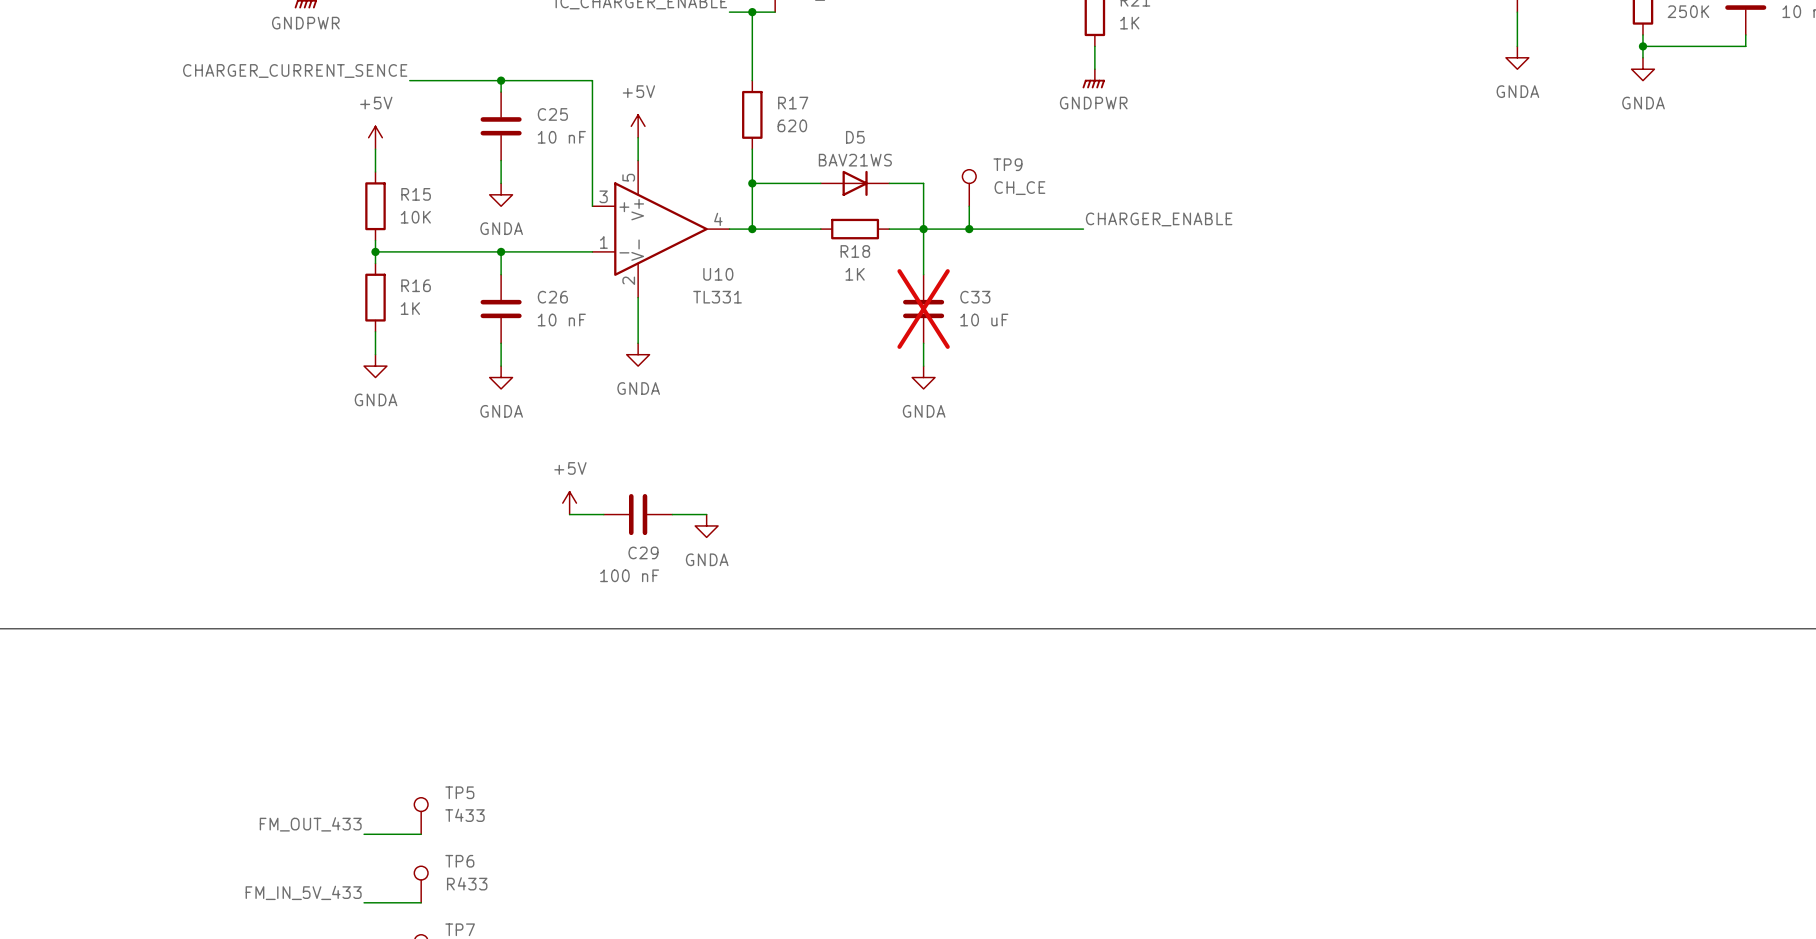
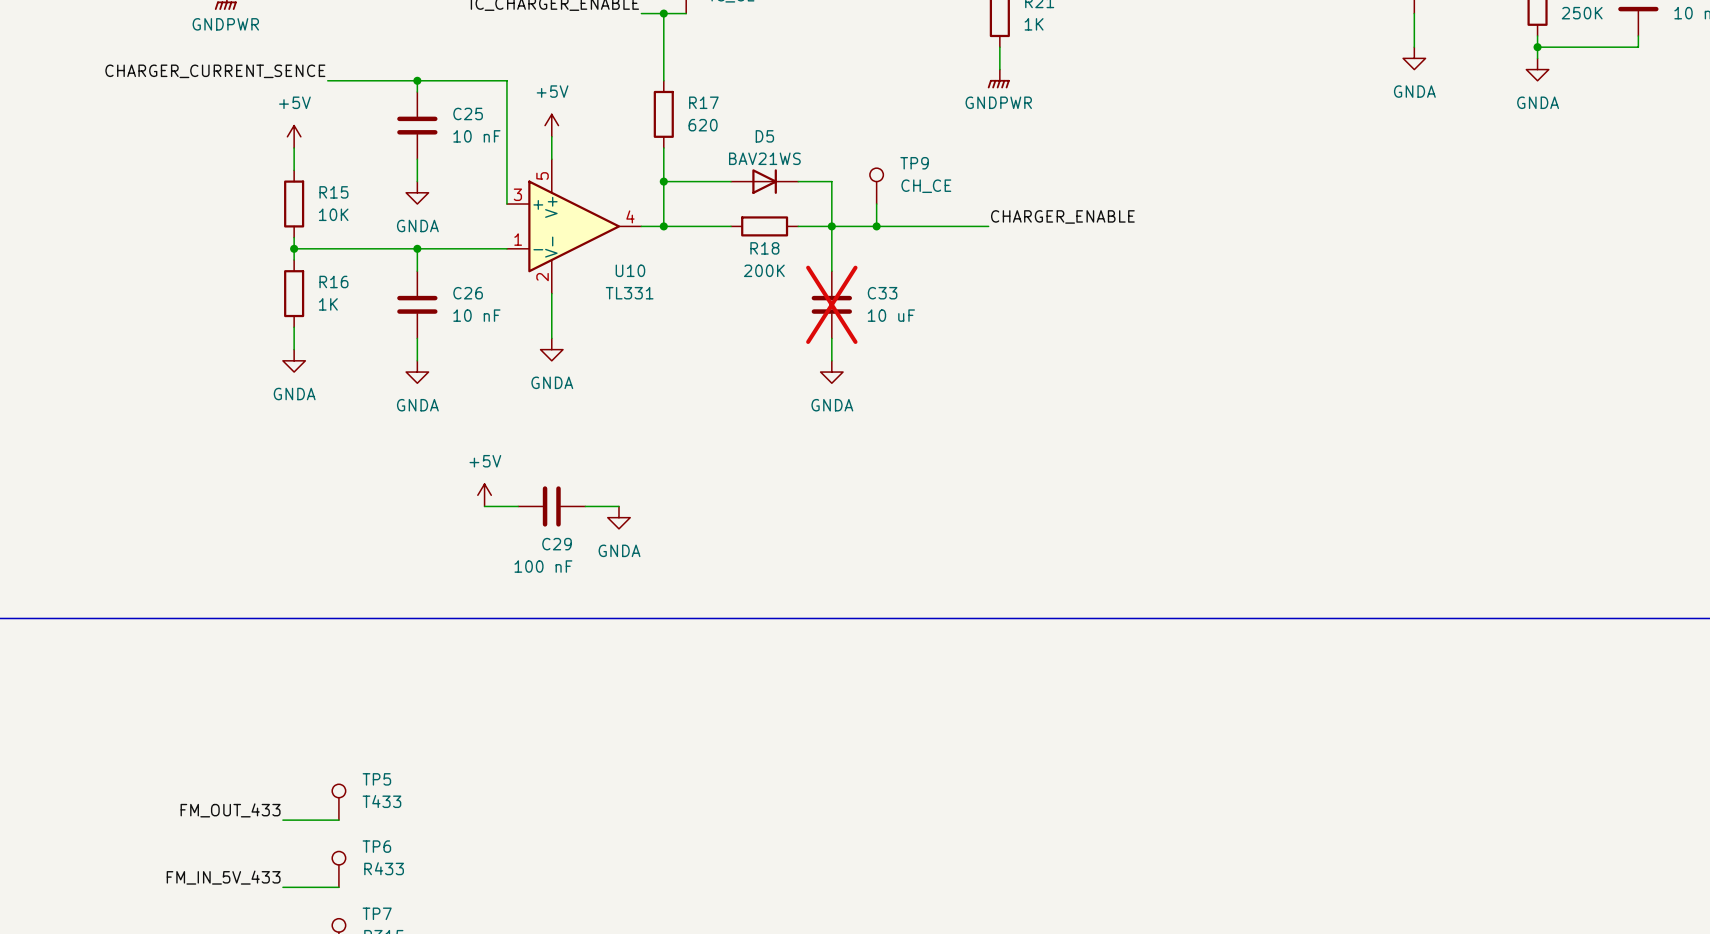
R18 value: 1K (855, 274) -> 200K (764, 270)

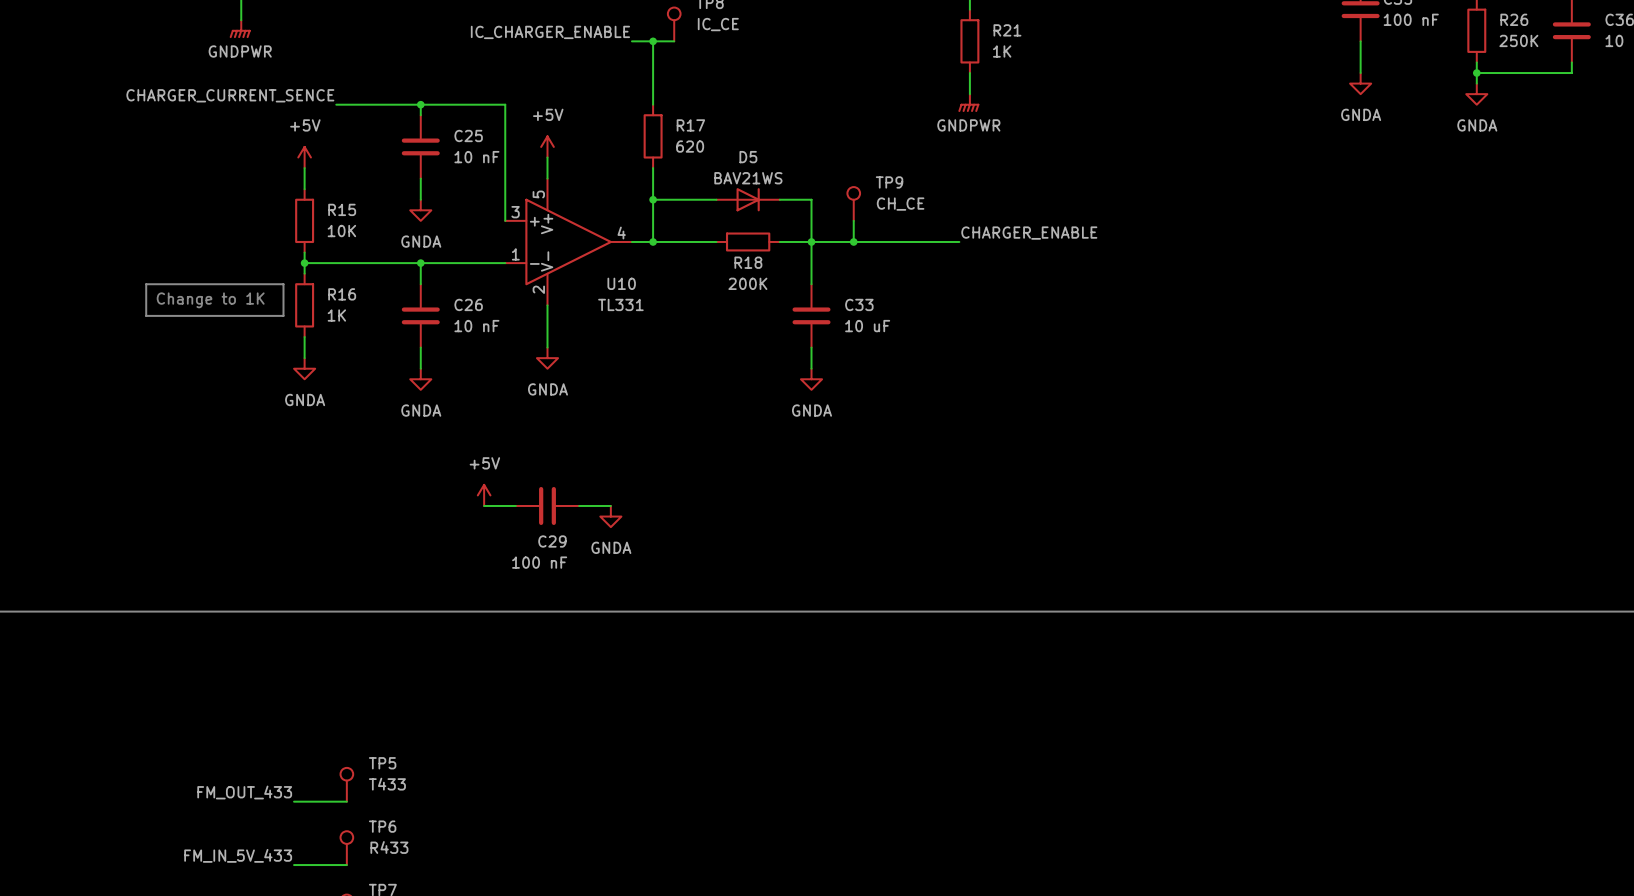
line: none -> (146, 284) (283, 284) (283, 315) (146, 315) (146, 284)
text: none -> Change to 1K (210, 300)
C33 do-not-place cross: (831, 304) -> none

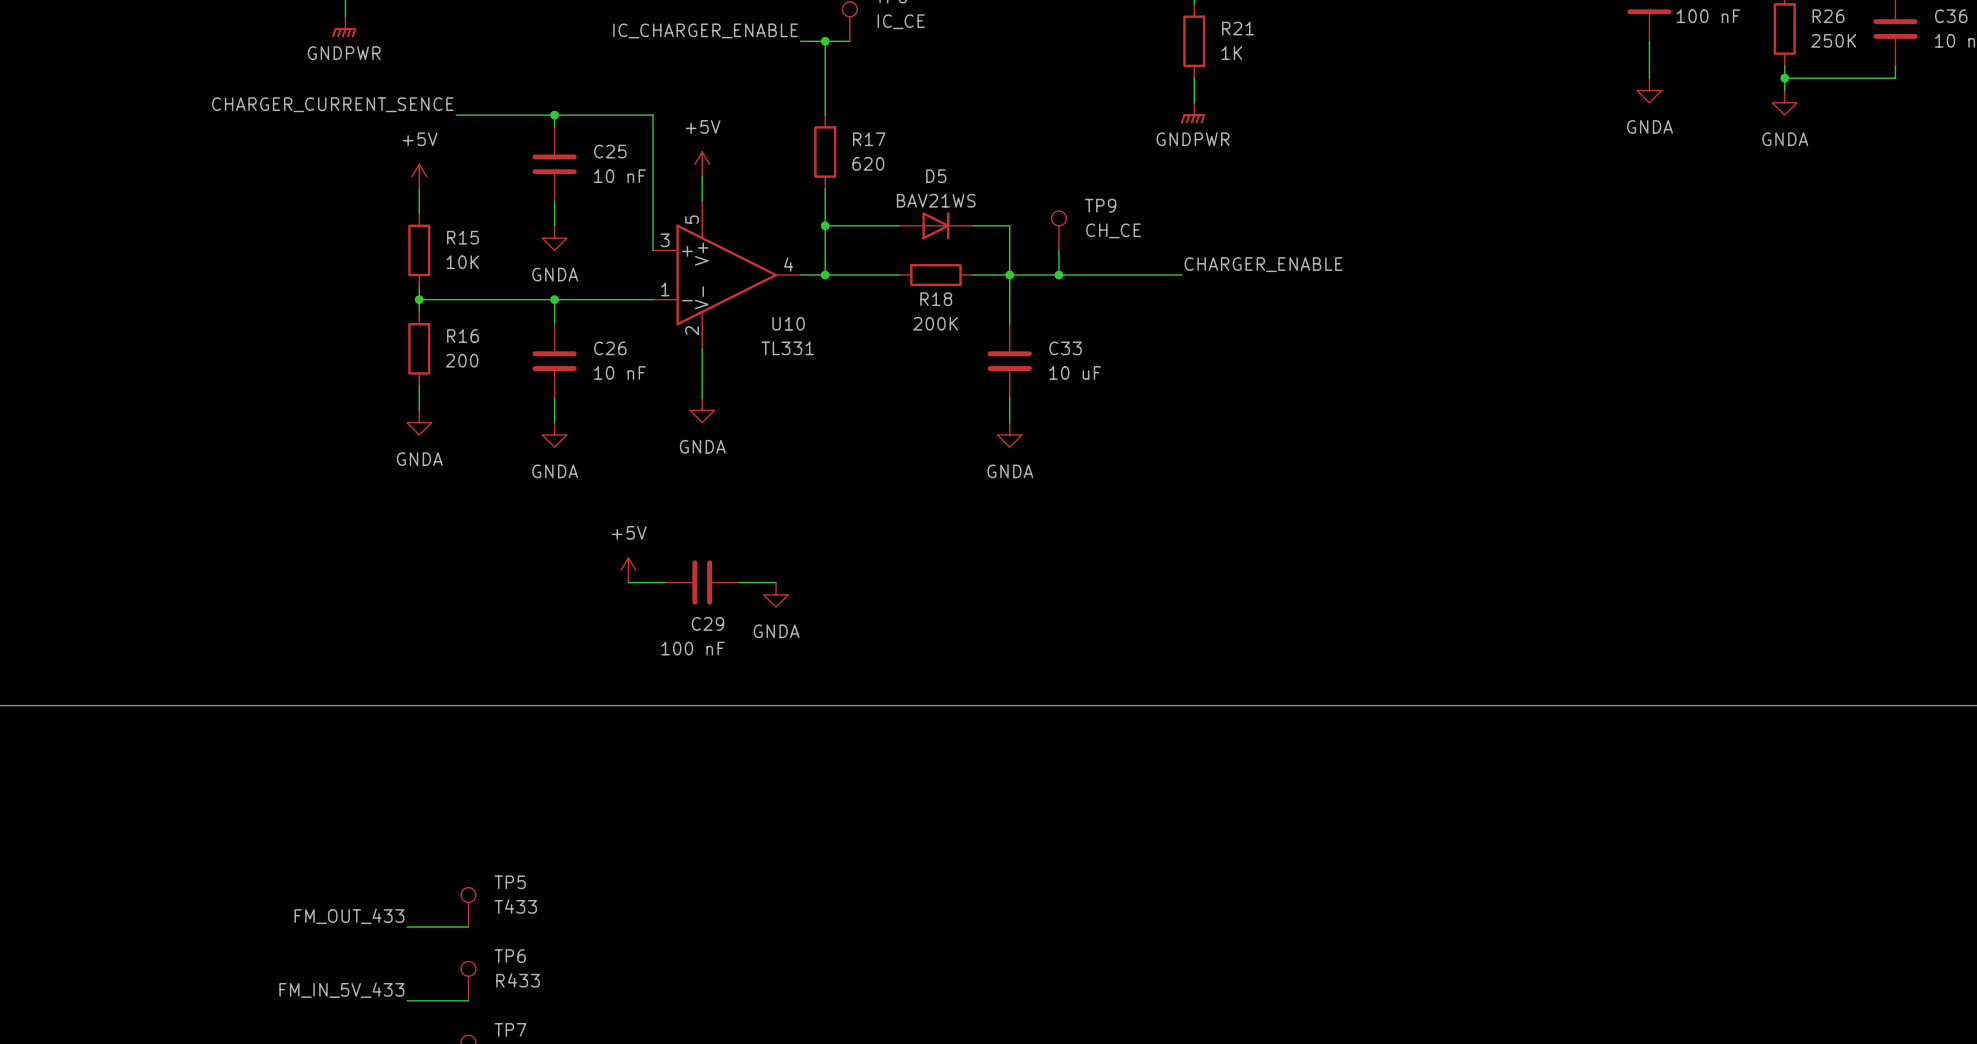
line: (146, 284) (283, 284) (283, 315) (146, 315) (146, 284) -> none
text: Change to 1K (210, 300) -> none
R16 value: 1K (336, 315) -> 200 (462, 360)

